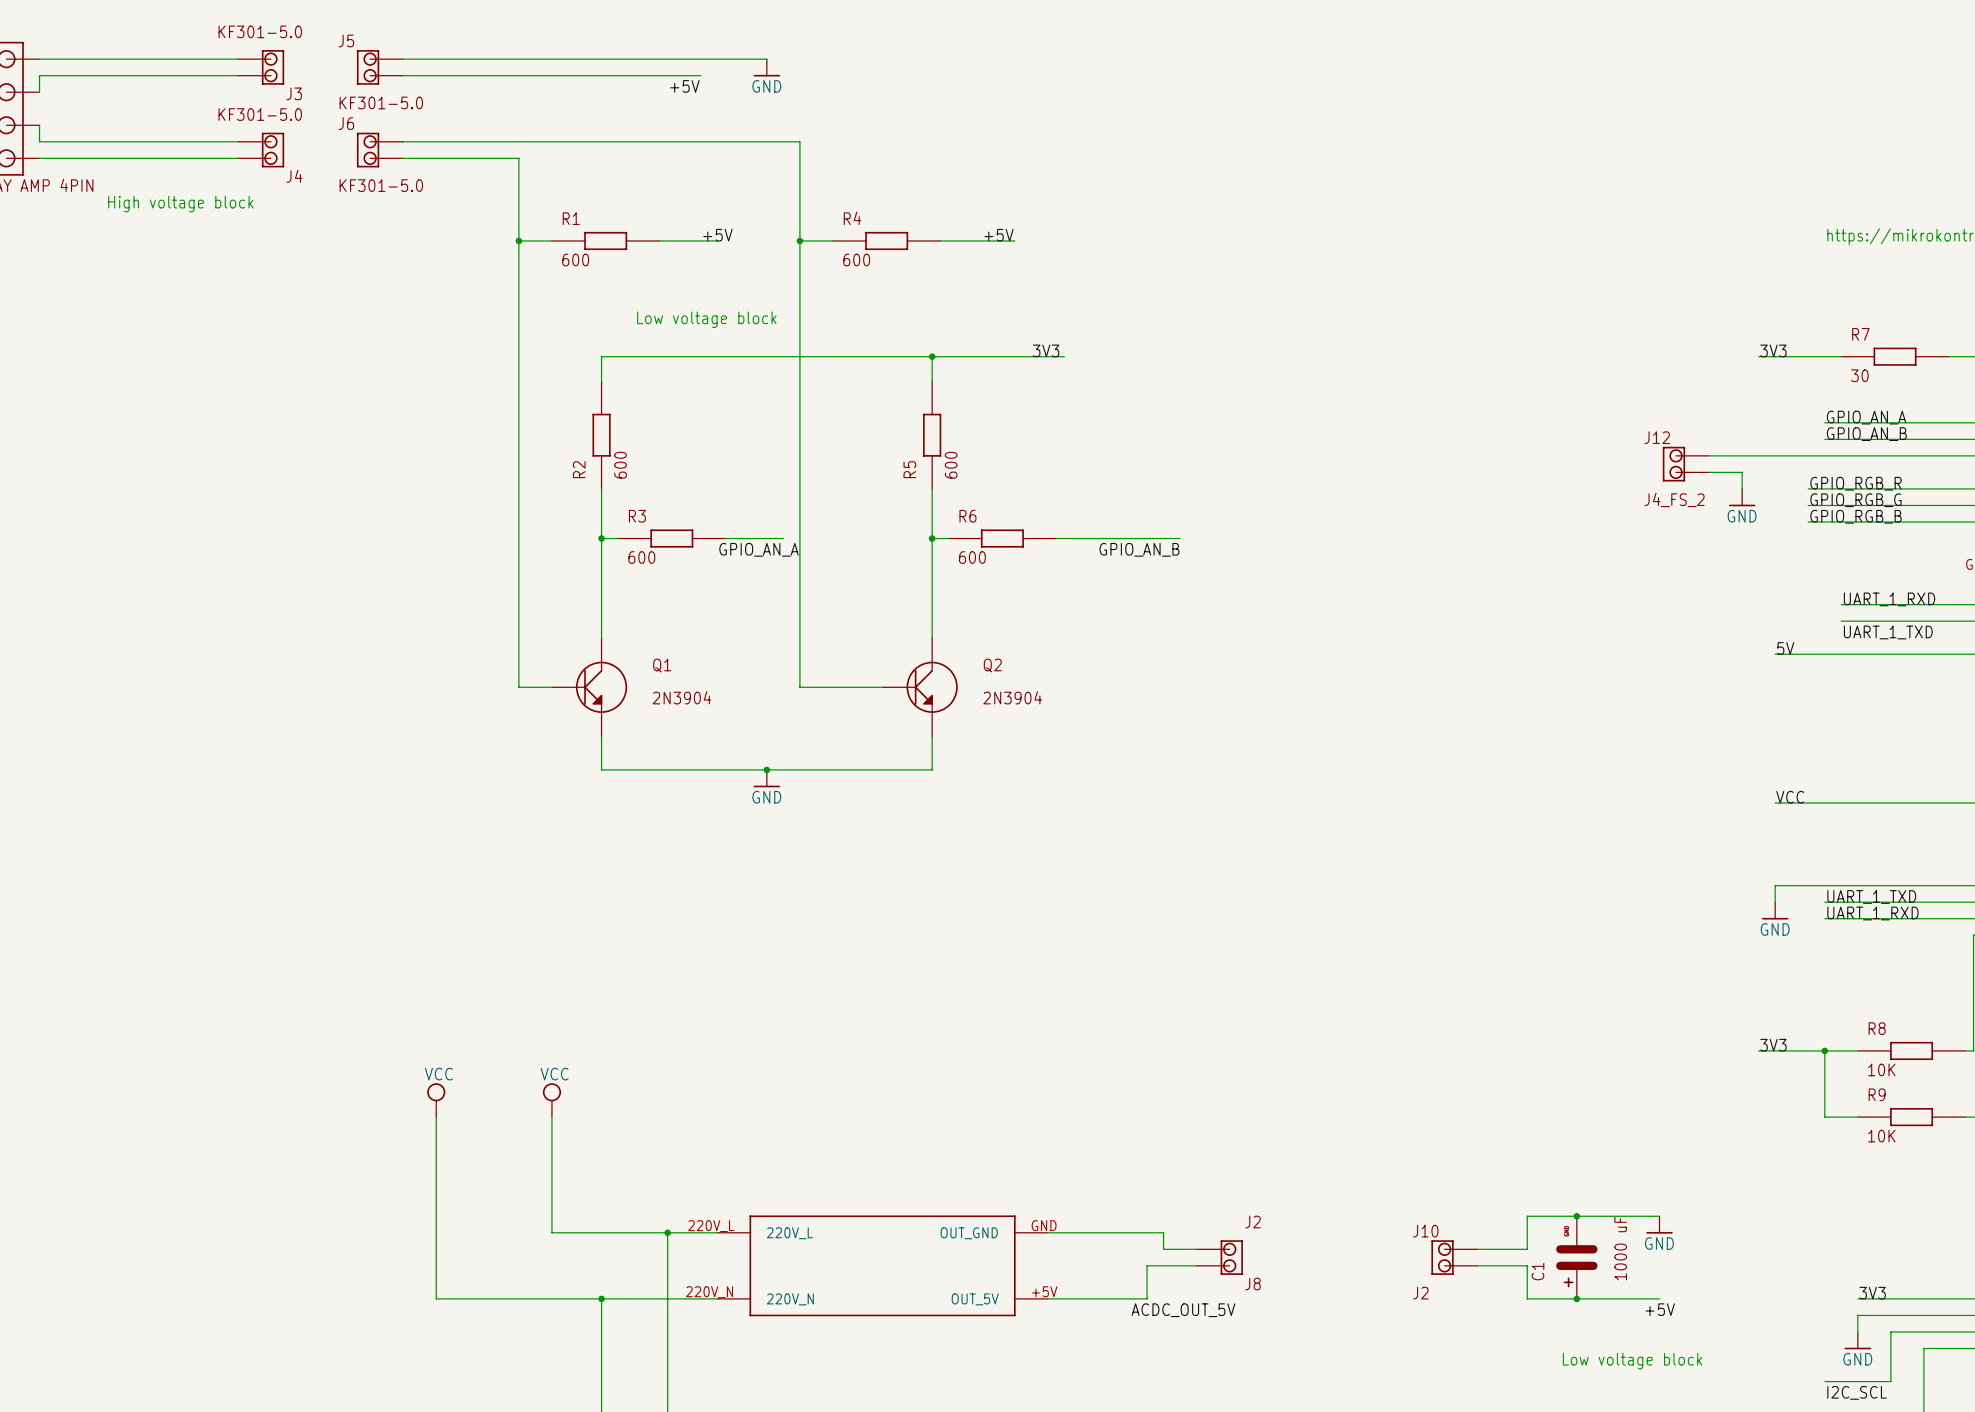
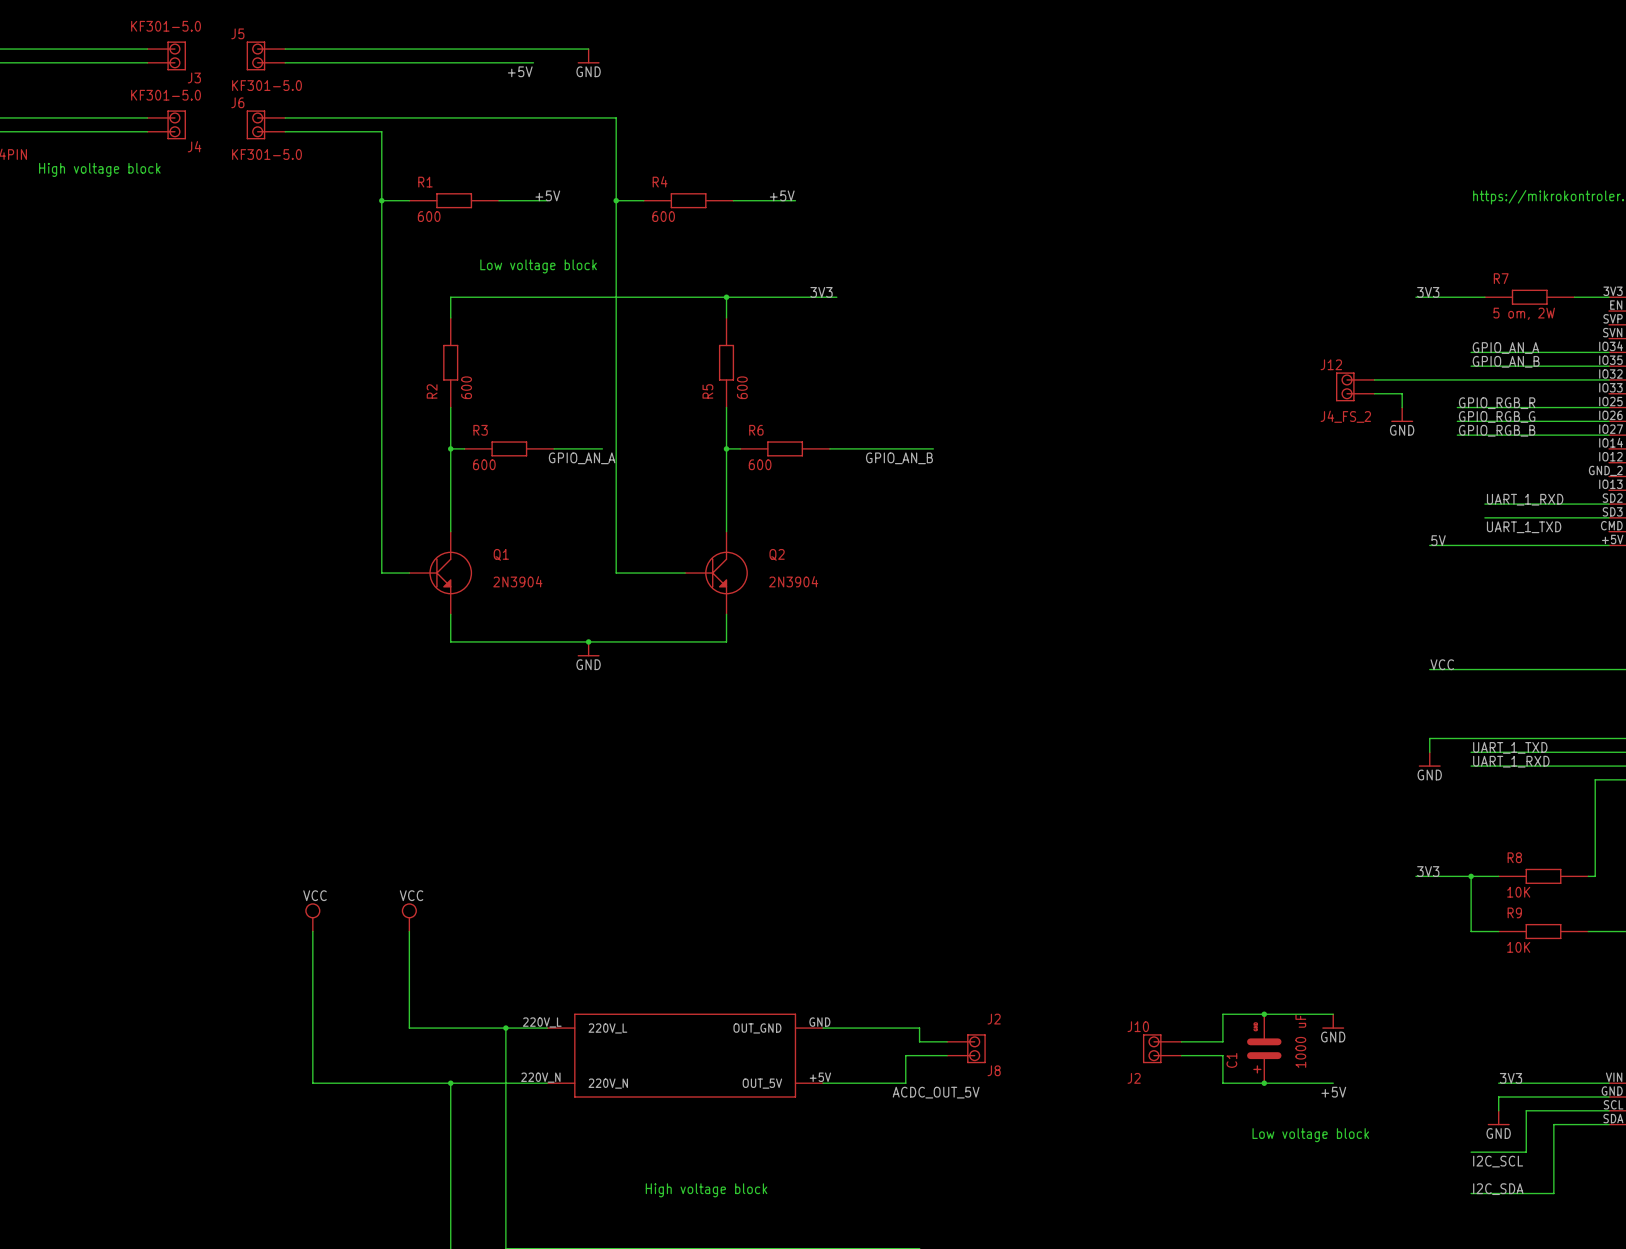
R7 value: 30 (1859, 375) -> 5 om, 2W (1524, 313)

